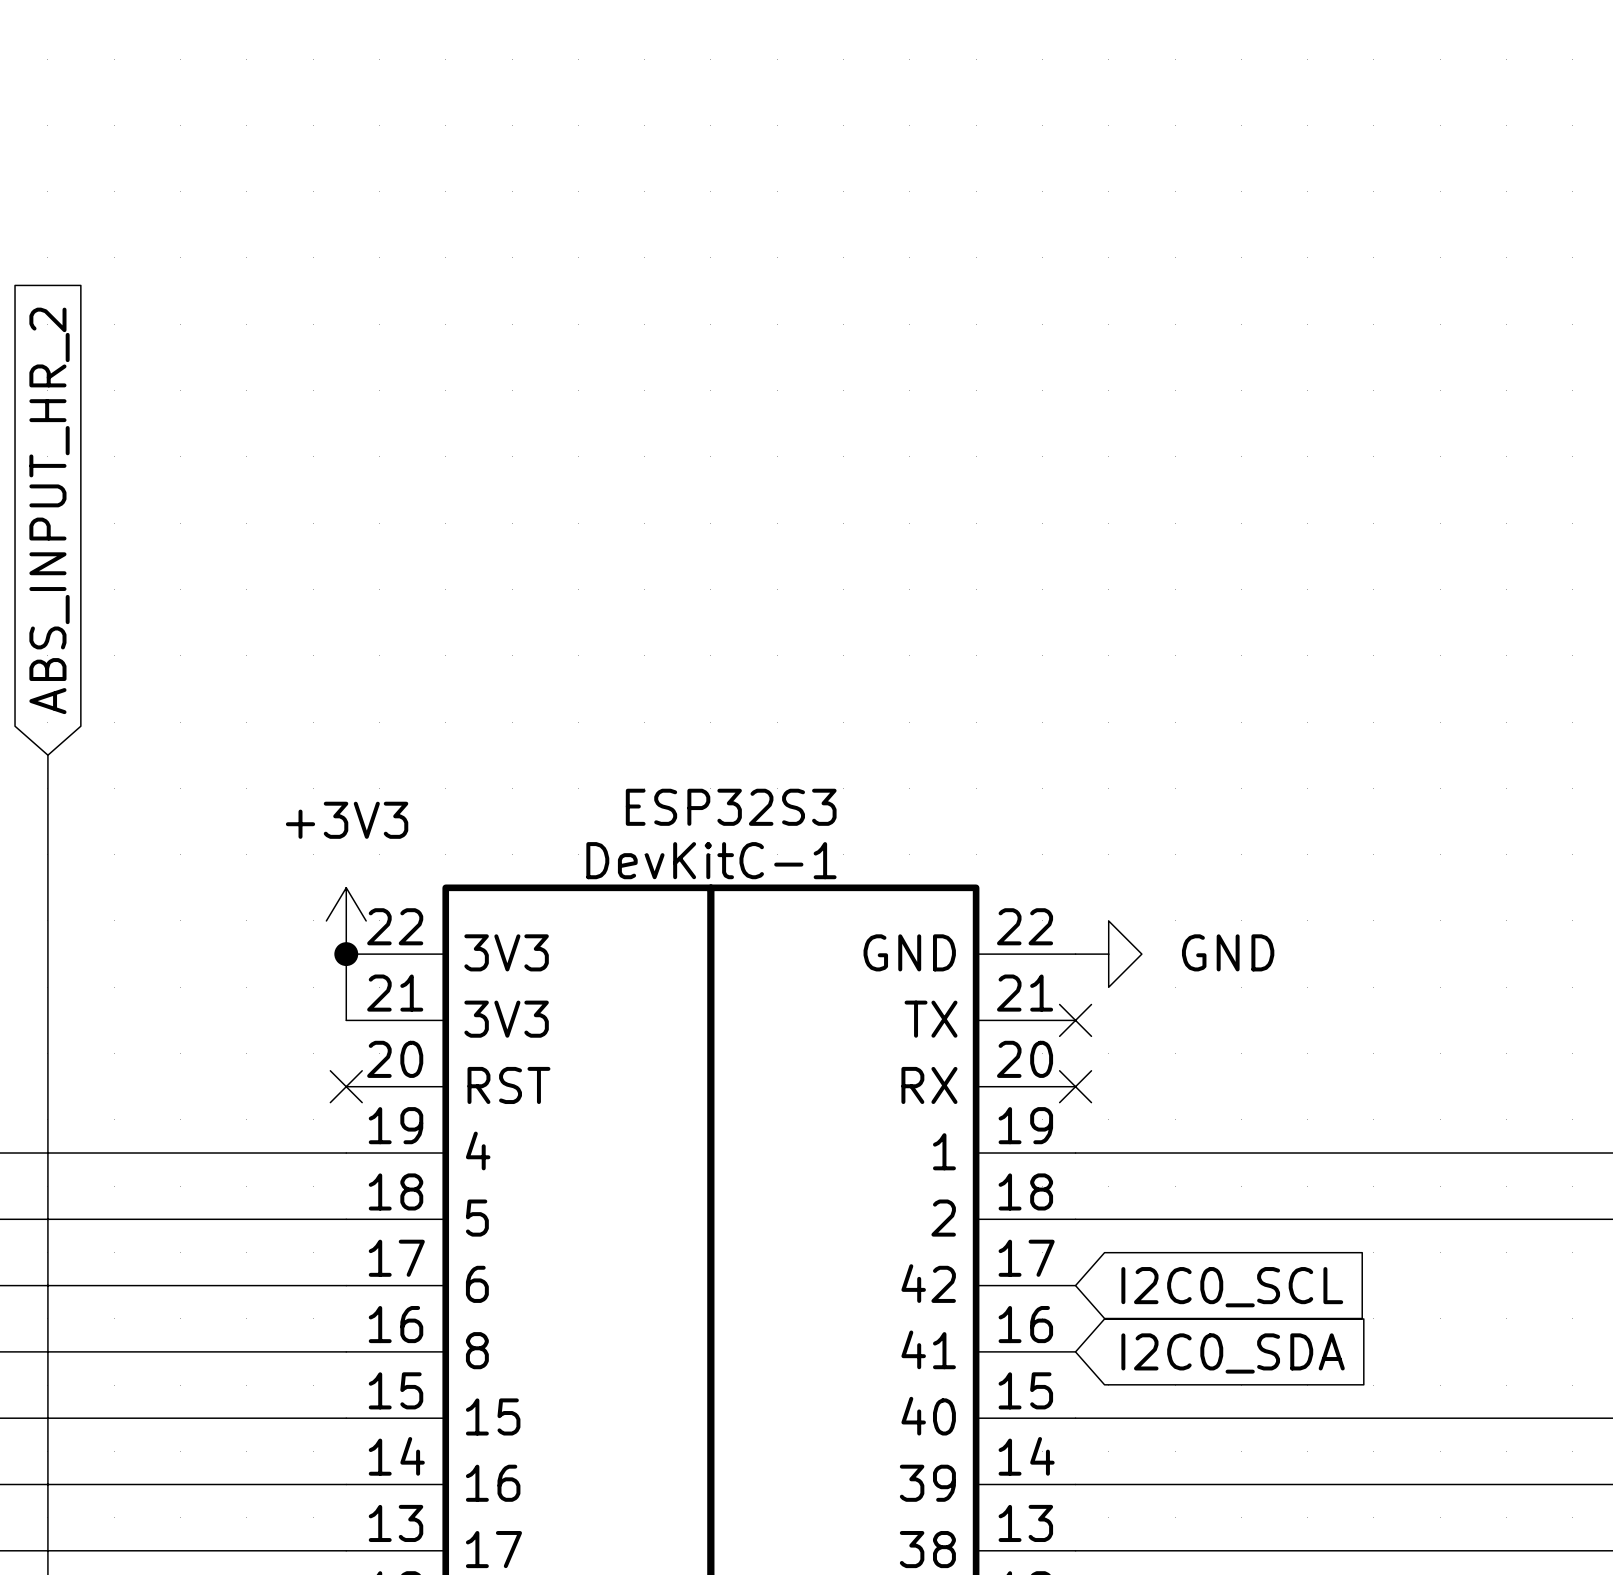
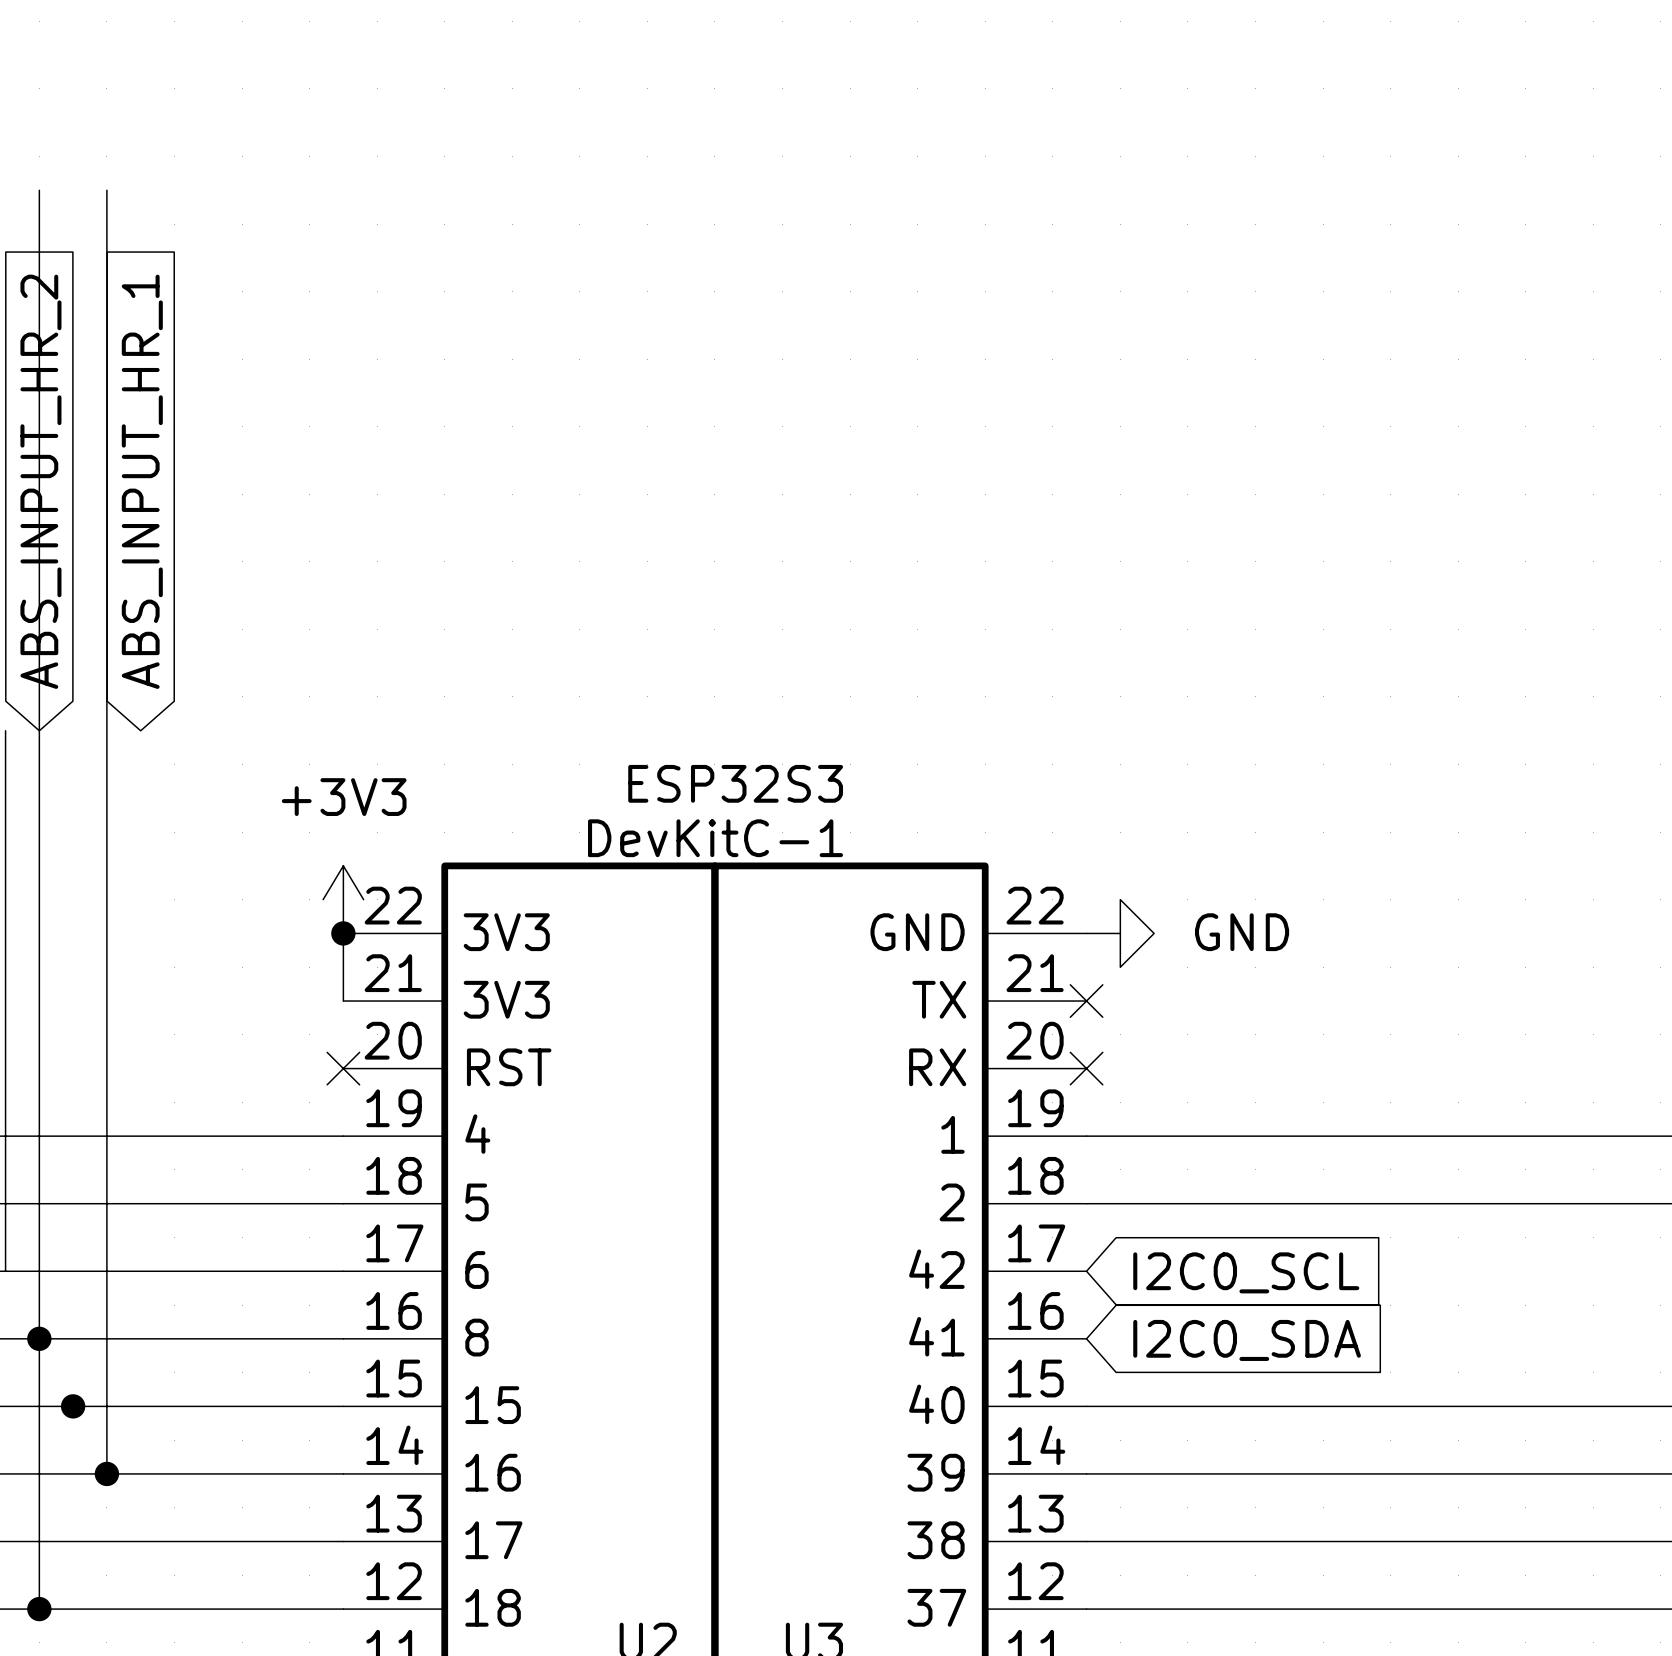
wire: none -> (39, 190) (39, 730)
wire: none -> (106, 190) (106, 1473)
global label: none -> ABS_INPUT_HR_1 (142, 481)
wire: none -> (5, 730) (5, 1271)
junction: none -> (39, 1338)
junction: none -> (73, 1406)
junction: none -> (106, 1473)

